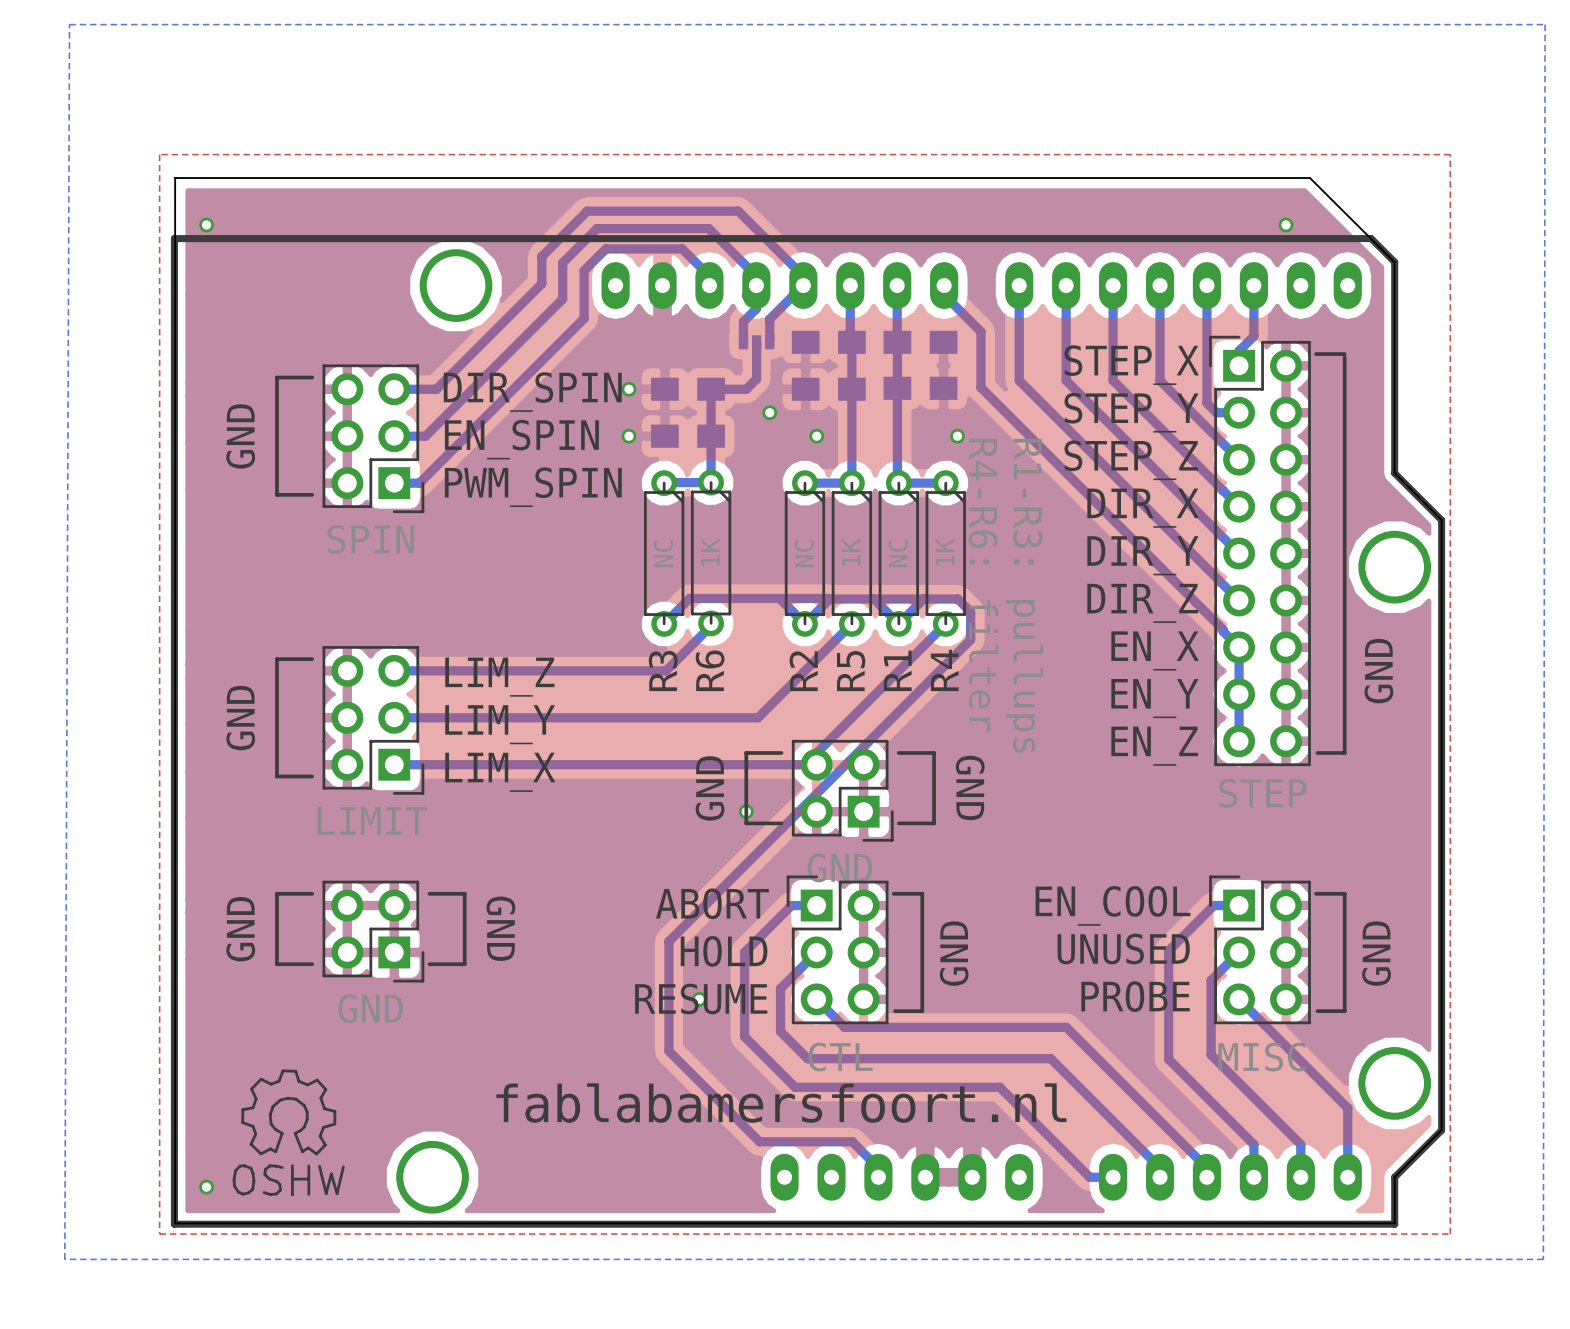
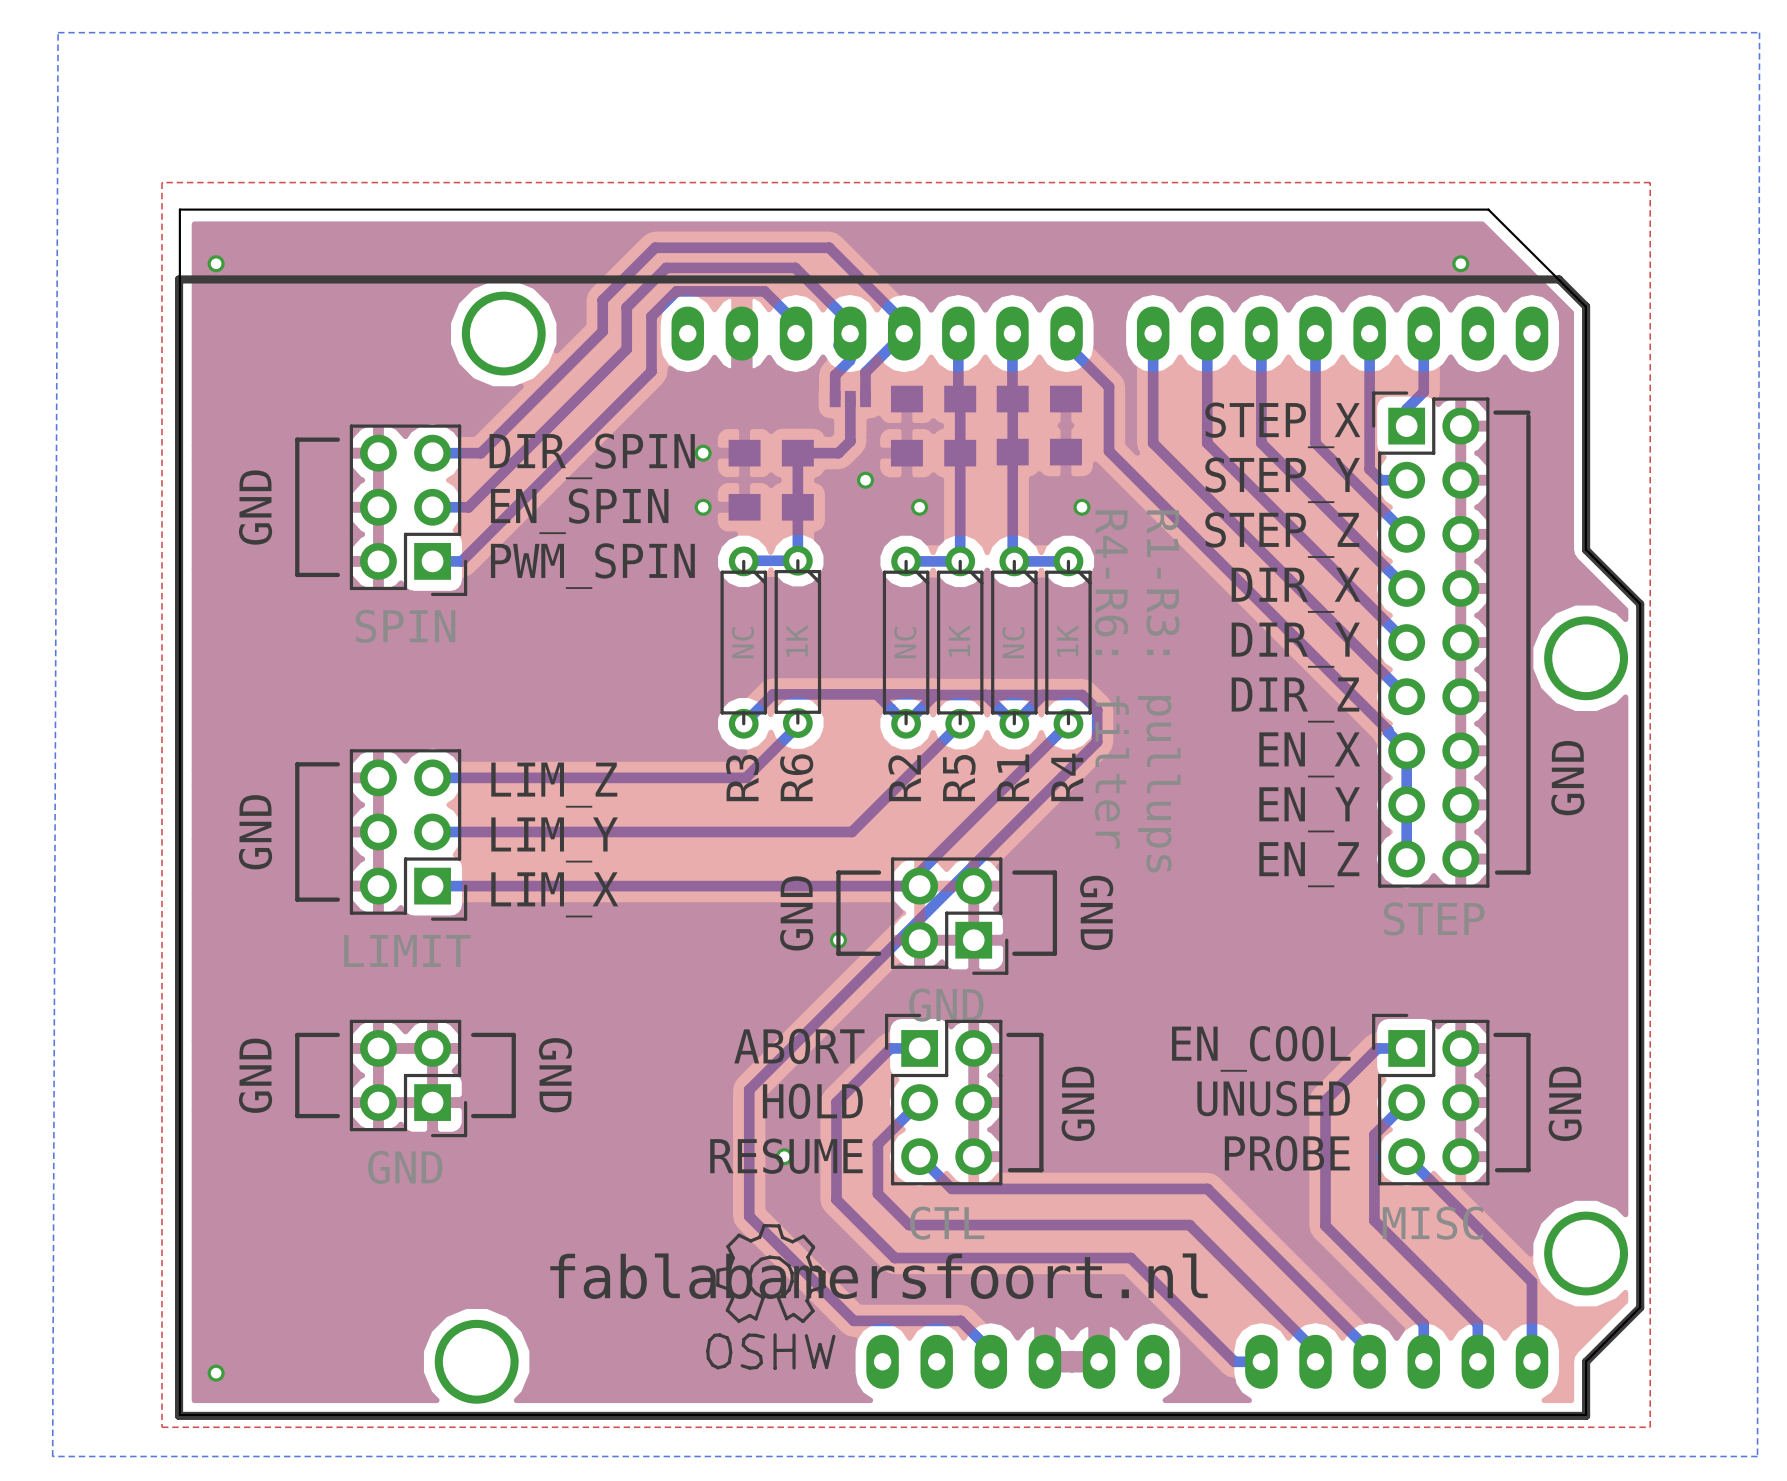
drawing position: (288, 1132) -> (770, 1296)

